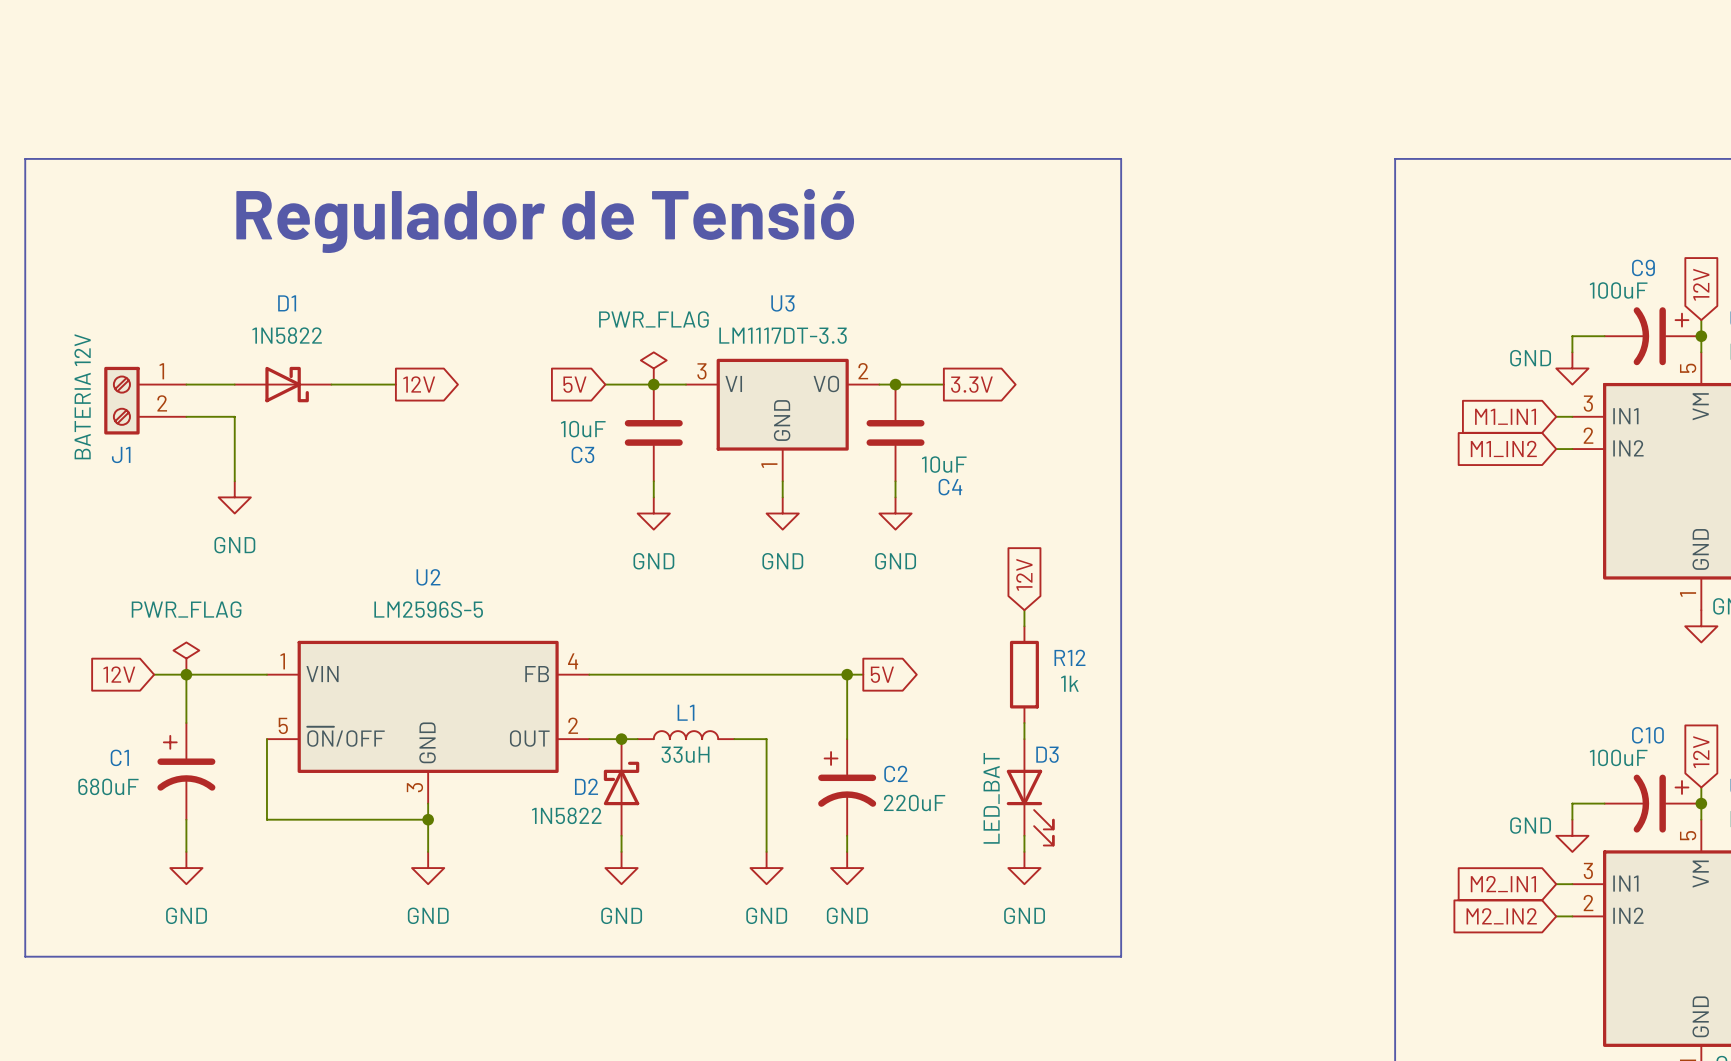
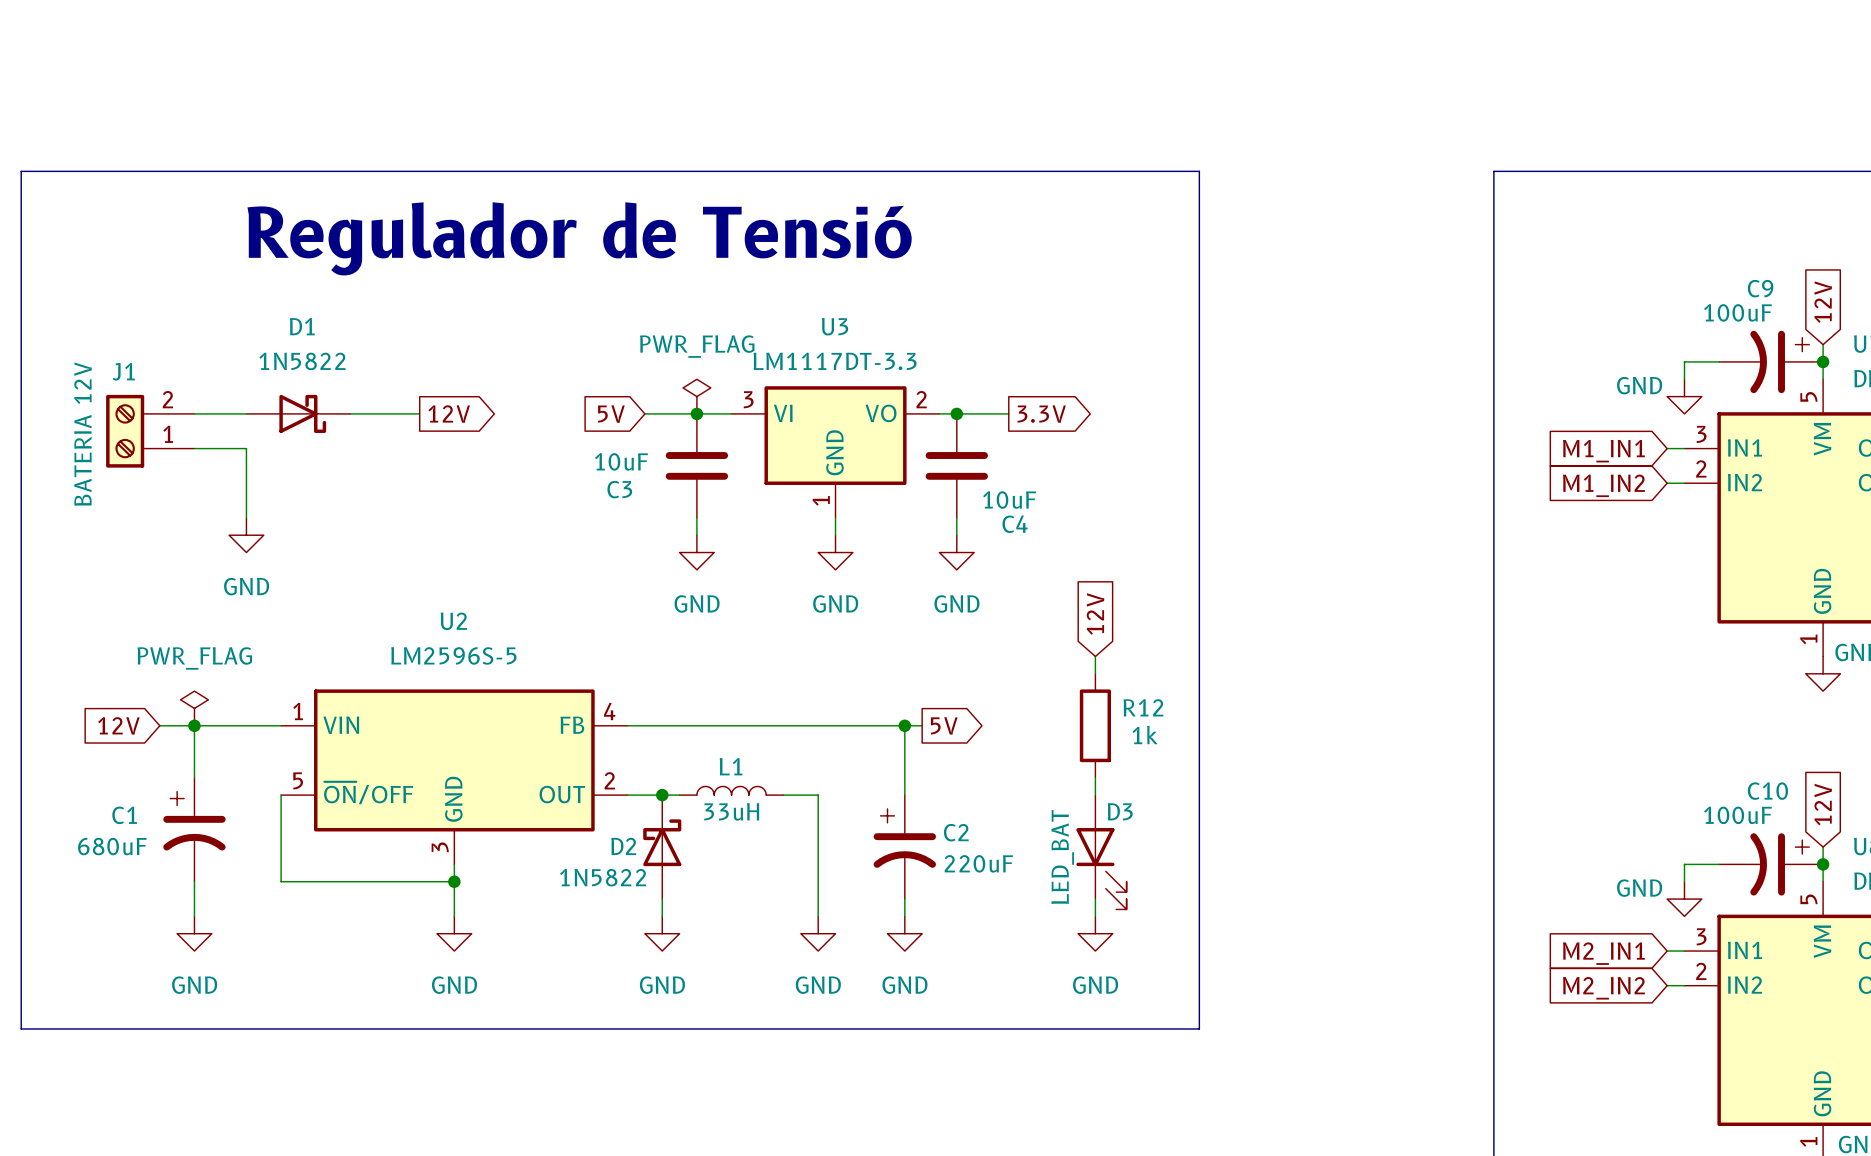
J1 flip: as is (121, 400) -> up-down (125, 431)

